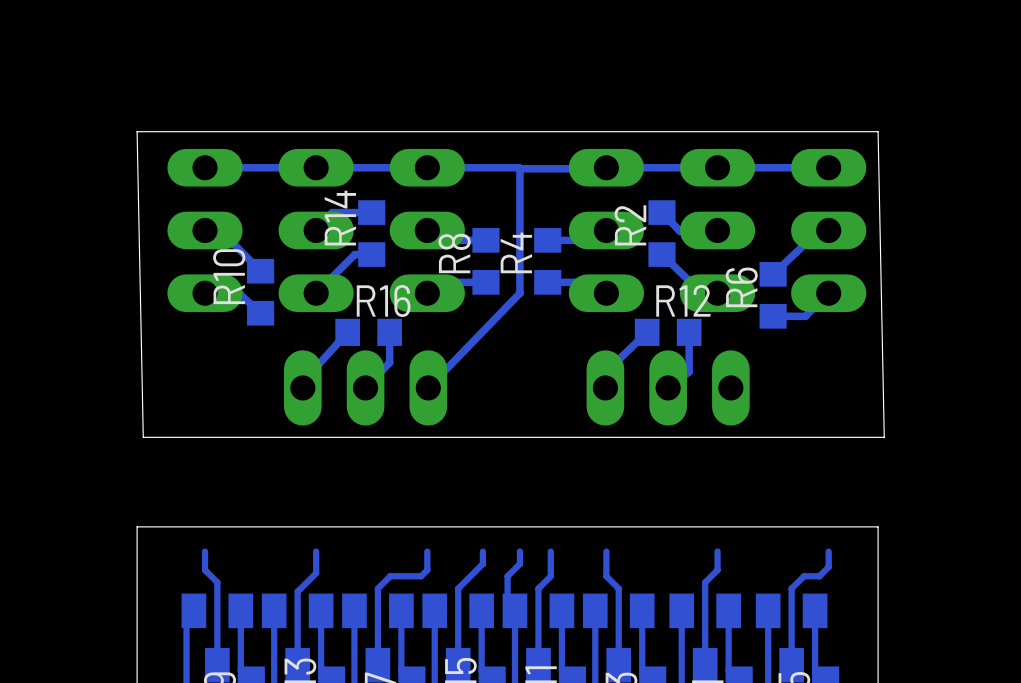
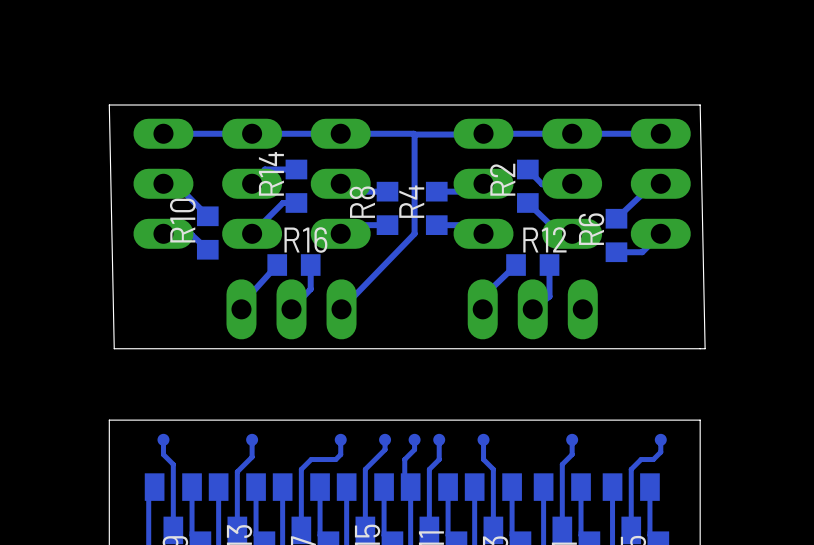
drawing: none -> [157, 433, 170, 446]
drawing: none -> [246, 433, 259, 446]
drawing: none -> [334, 433, 347, 446]
drawing: none -> [379, 433, 446, 446]
drawing: none -> [477, 433, 490, 446]
drawing: none -> [566, 433, 579, 446]
drawing: none -> [654, 433, 667, 446]

